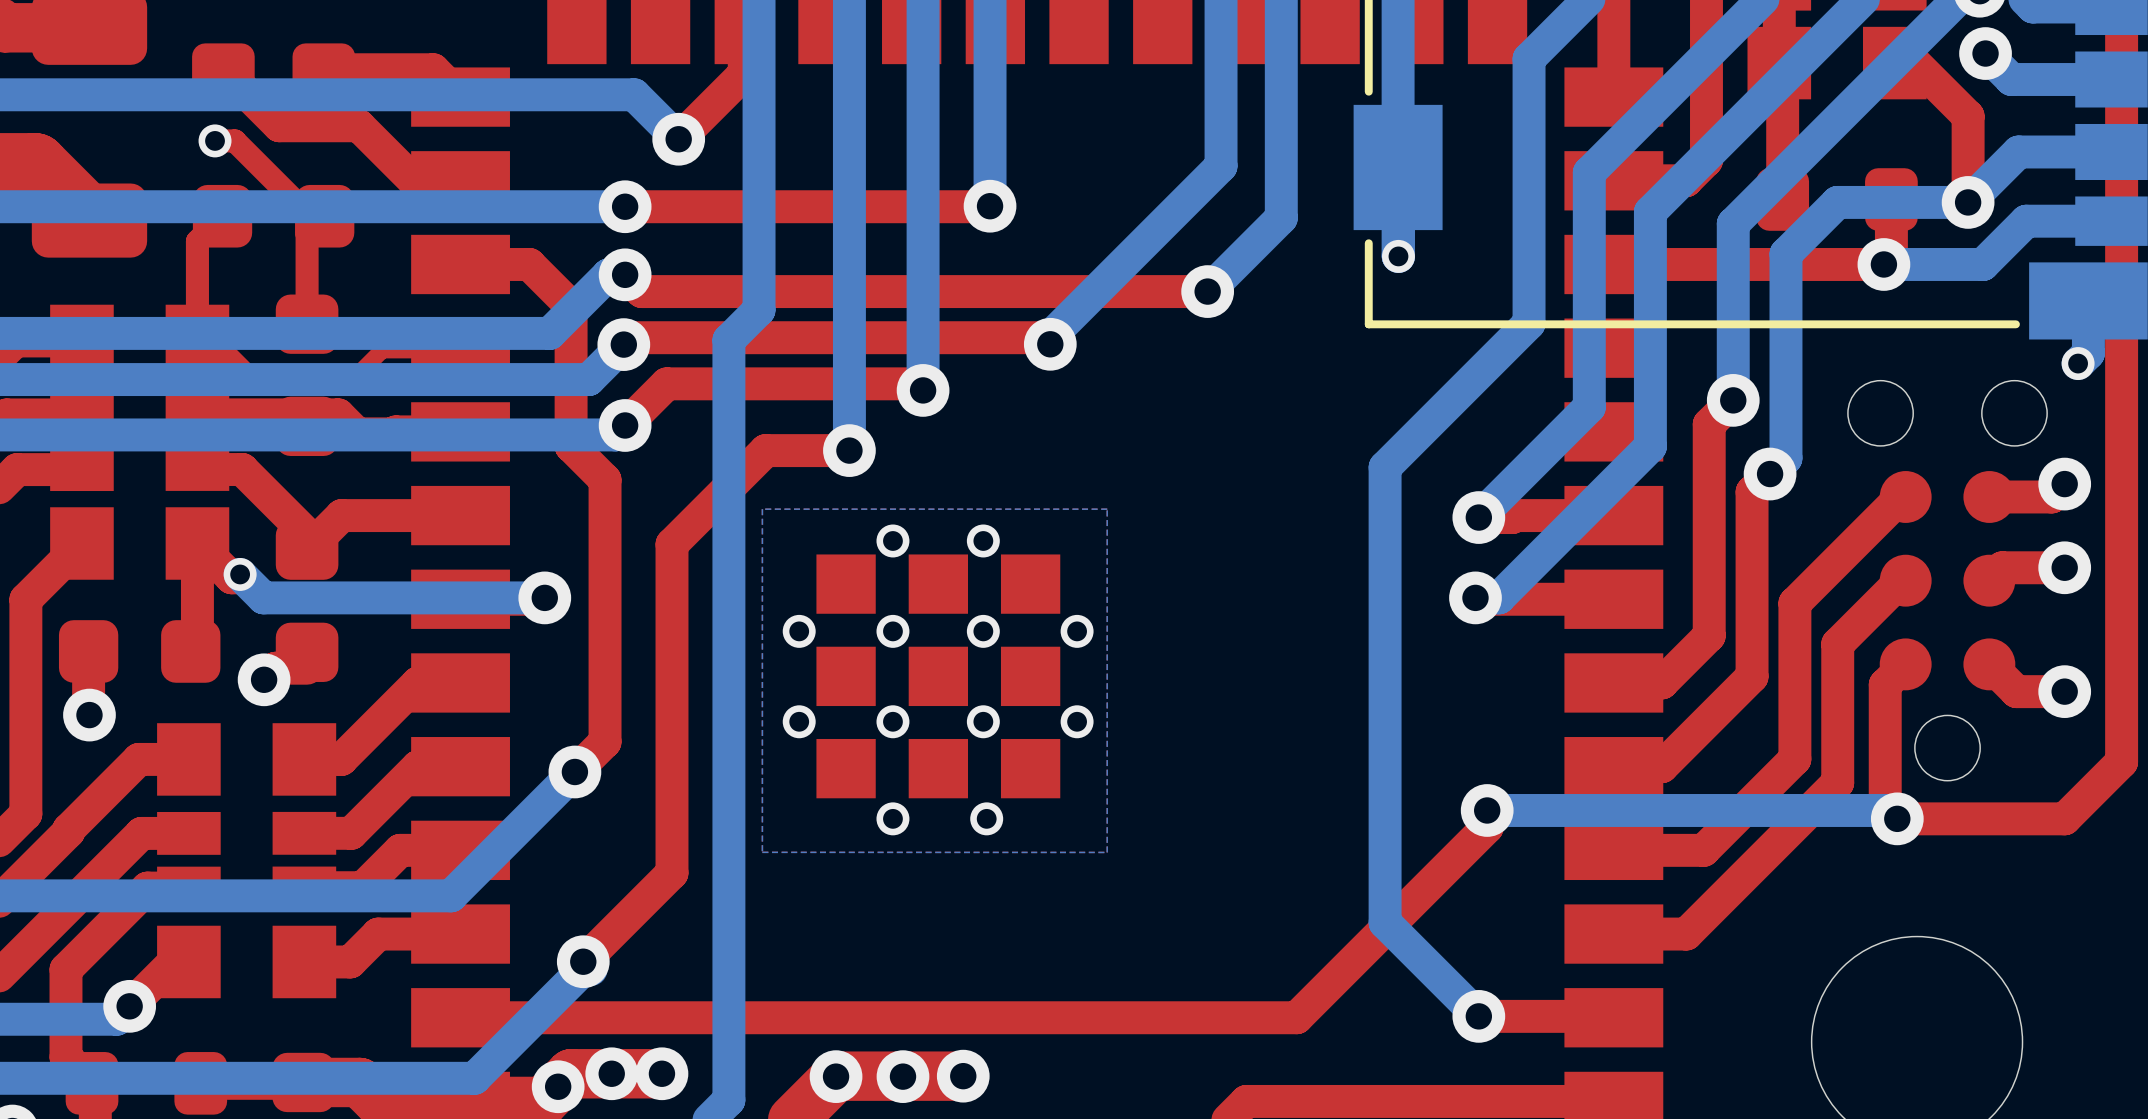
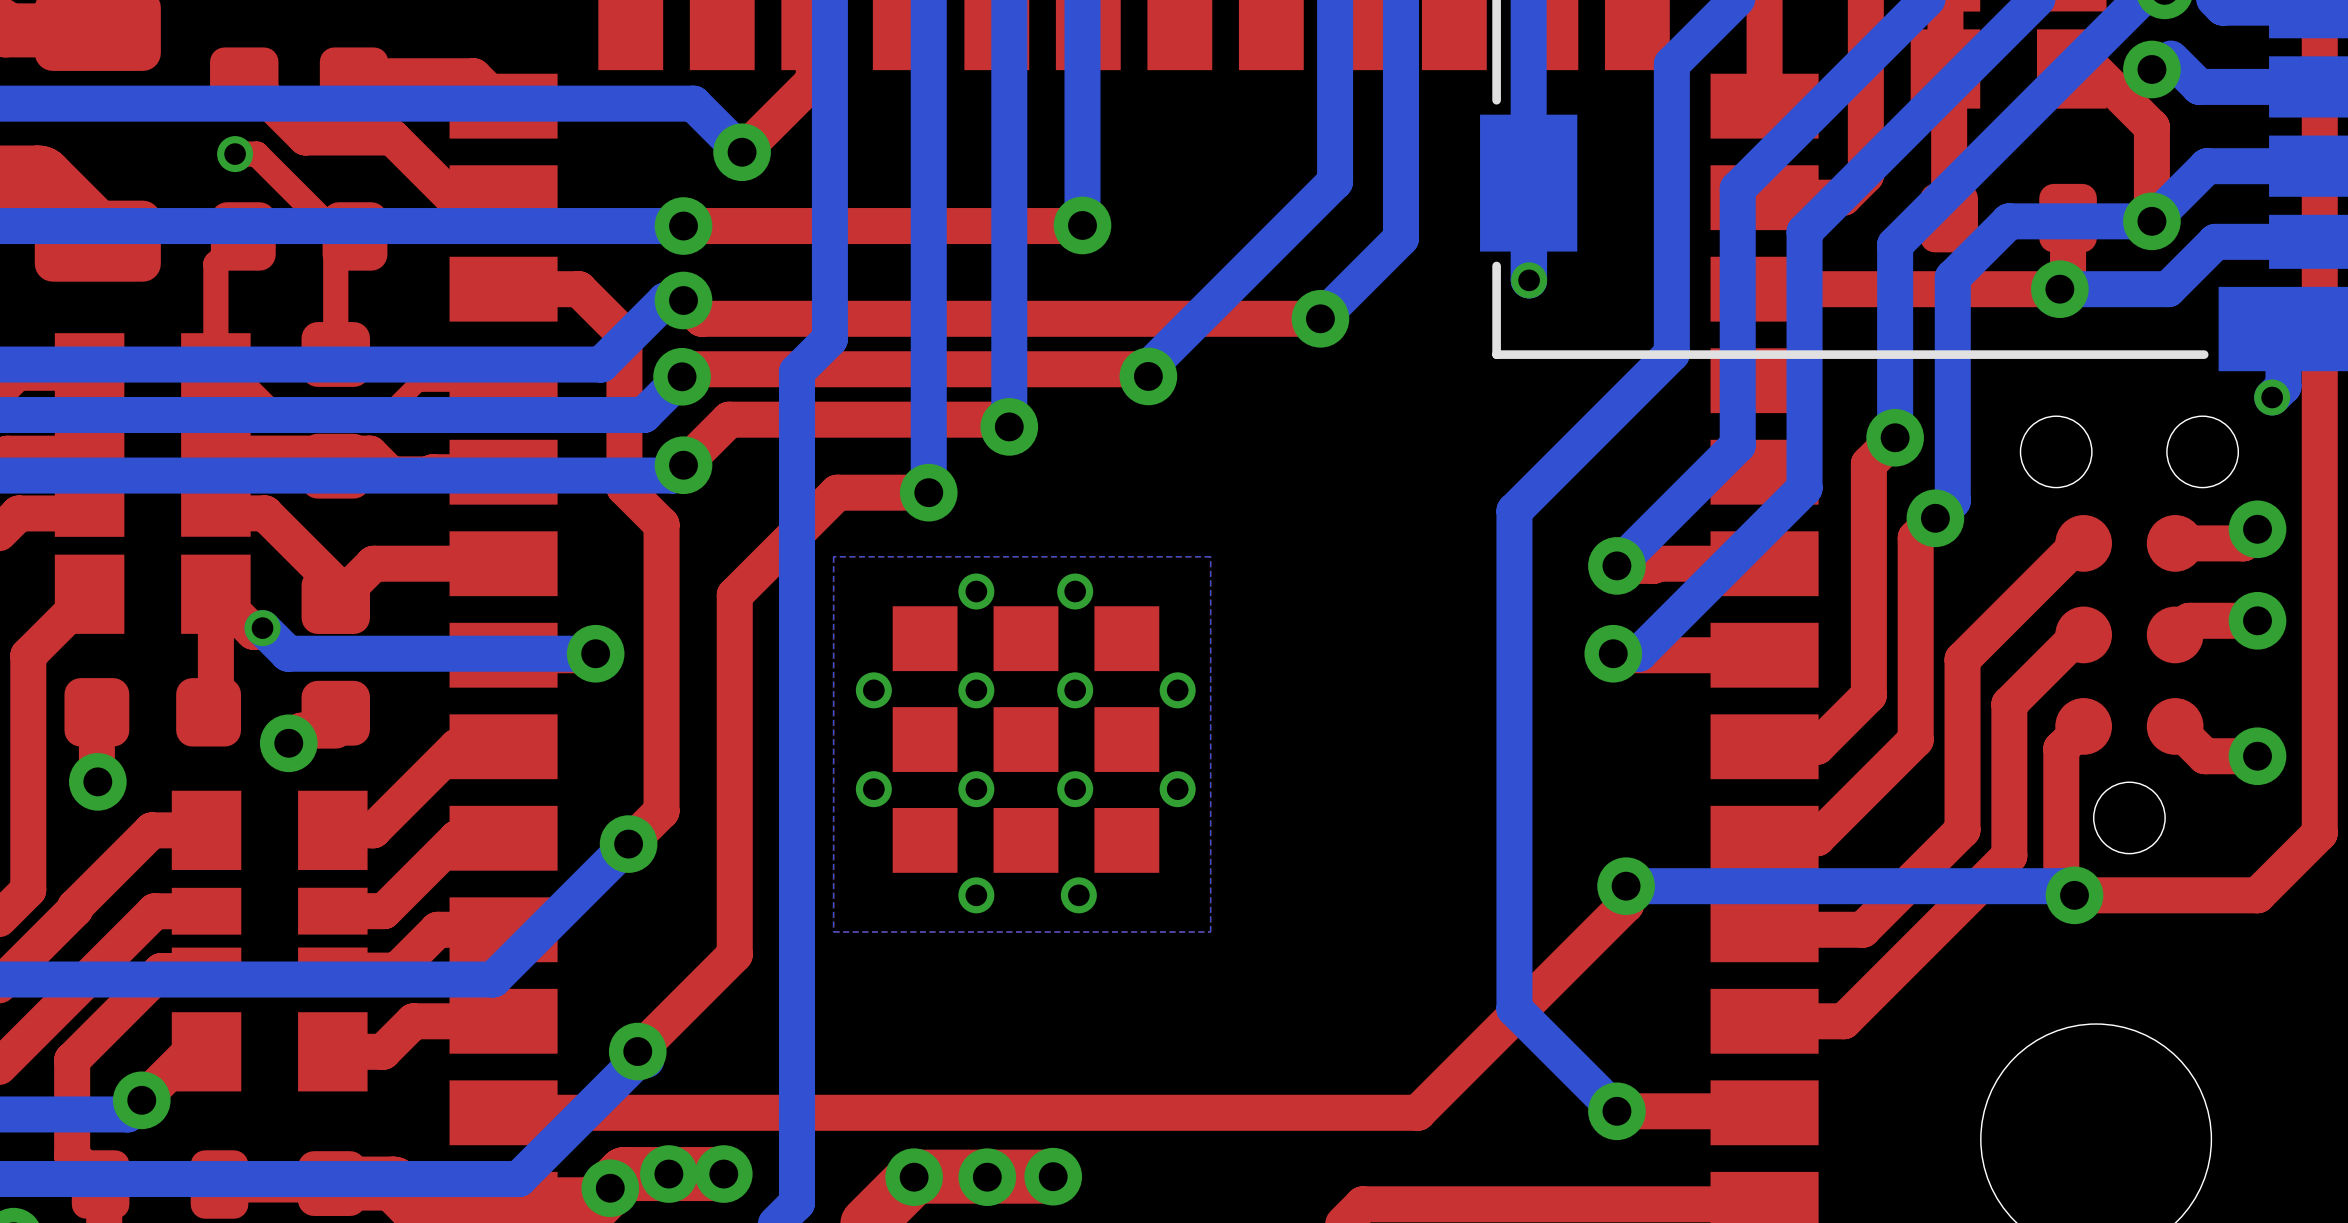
via position: (1985, 53) -> (2151, 69)

